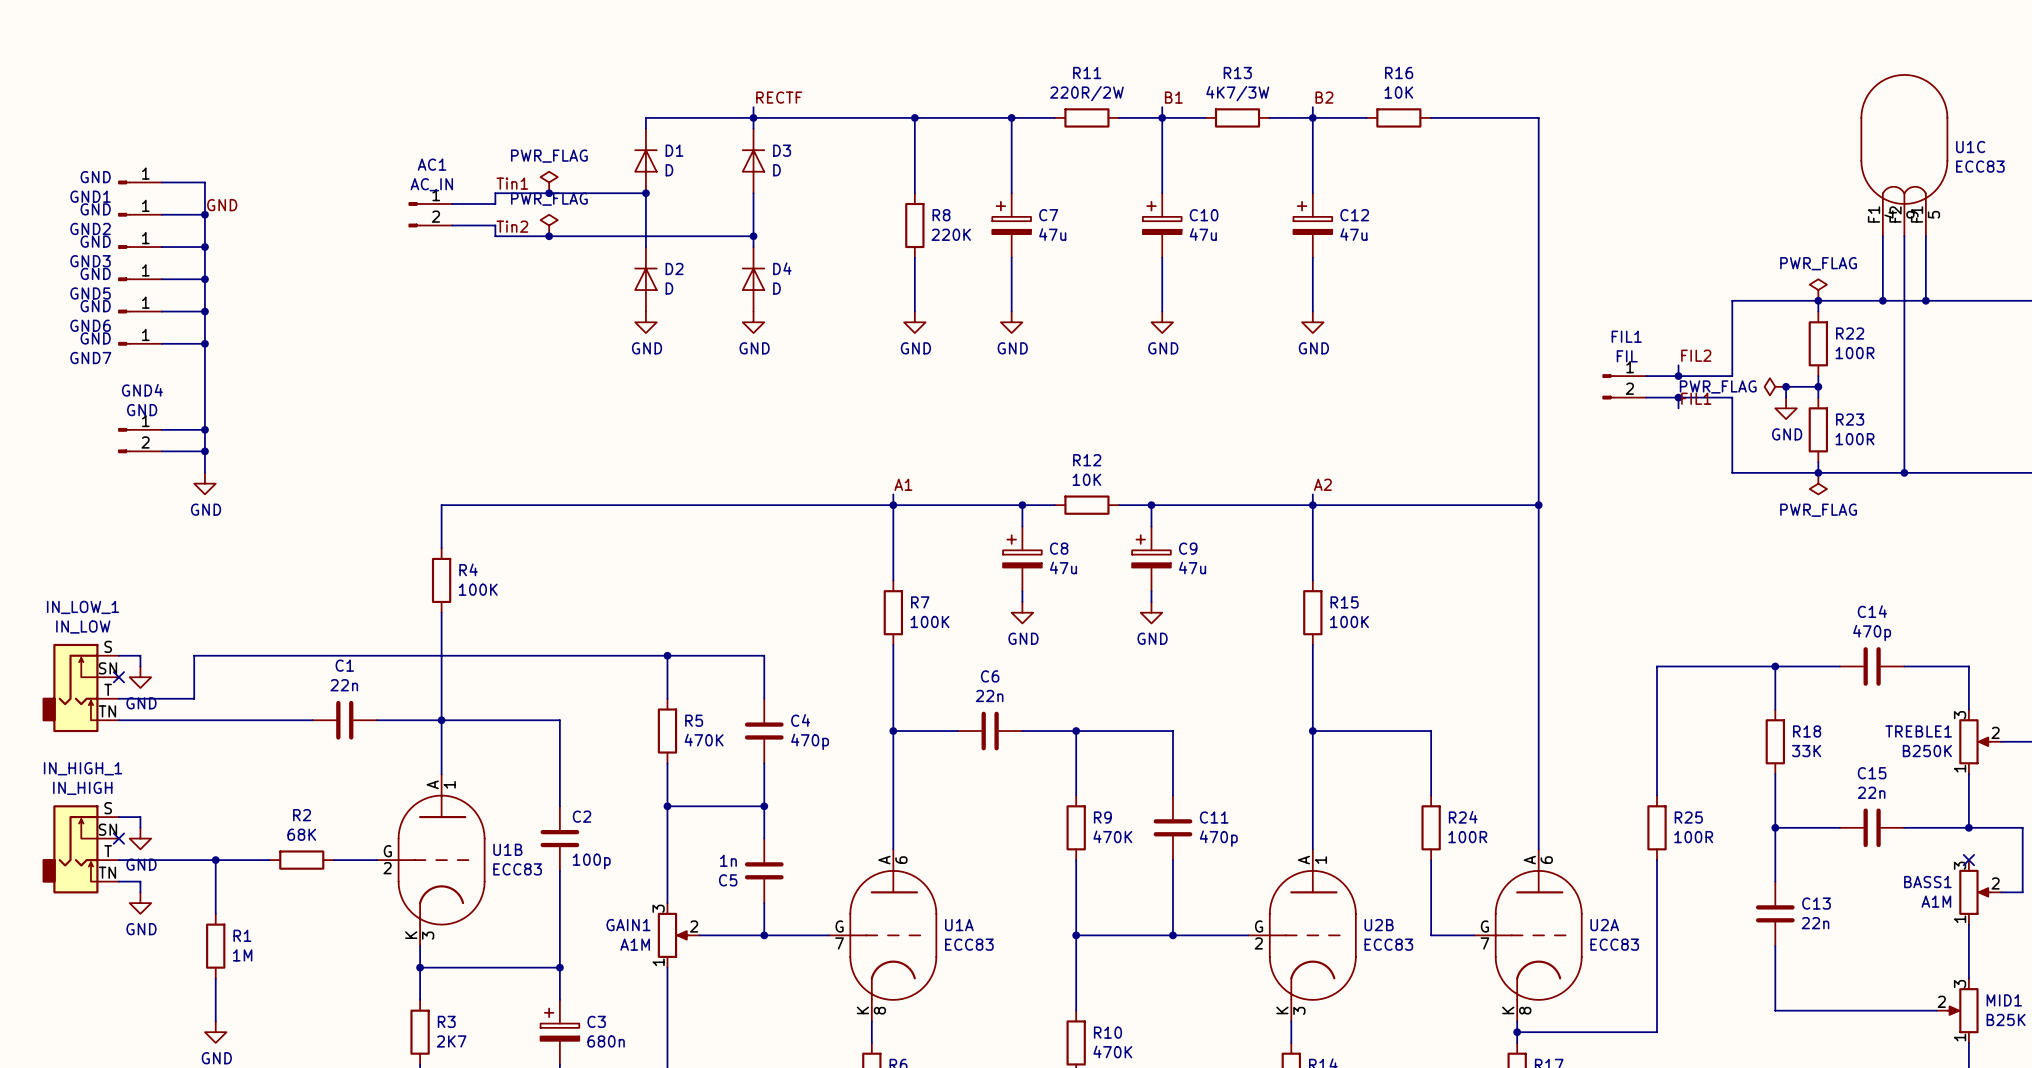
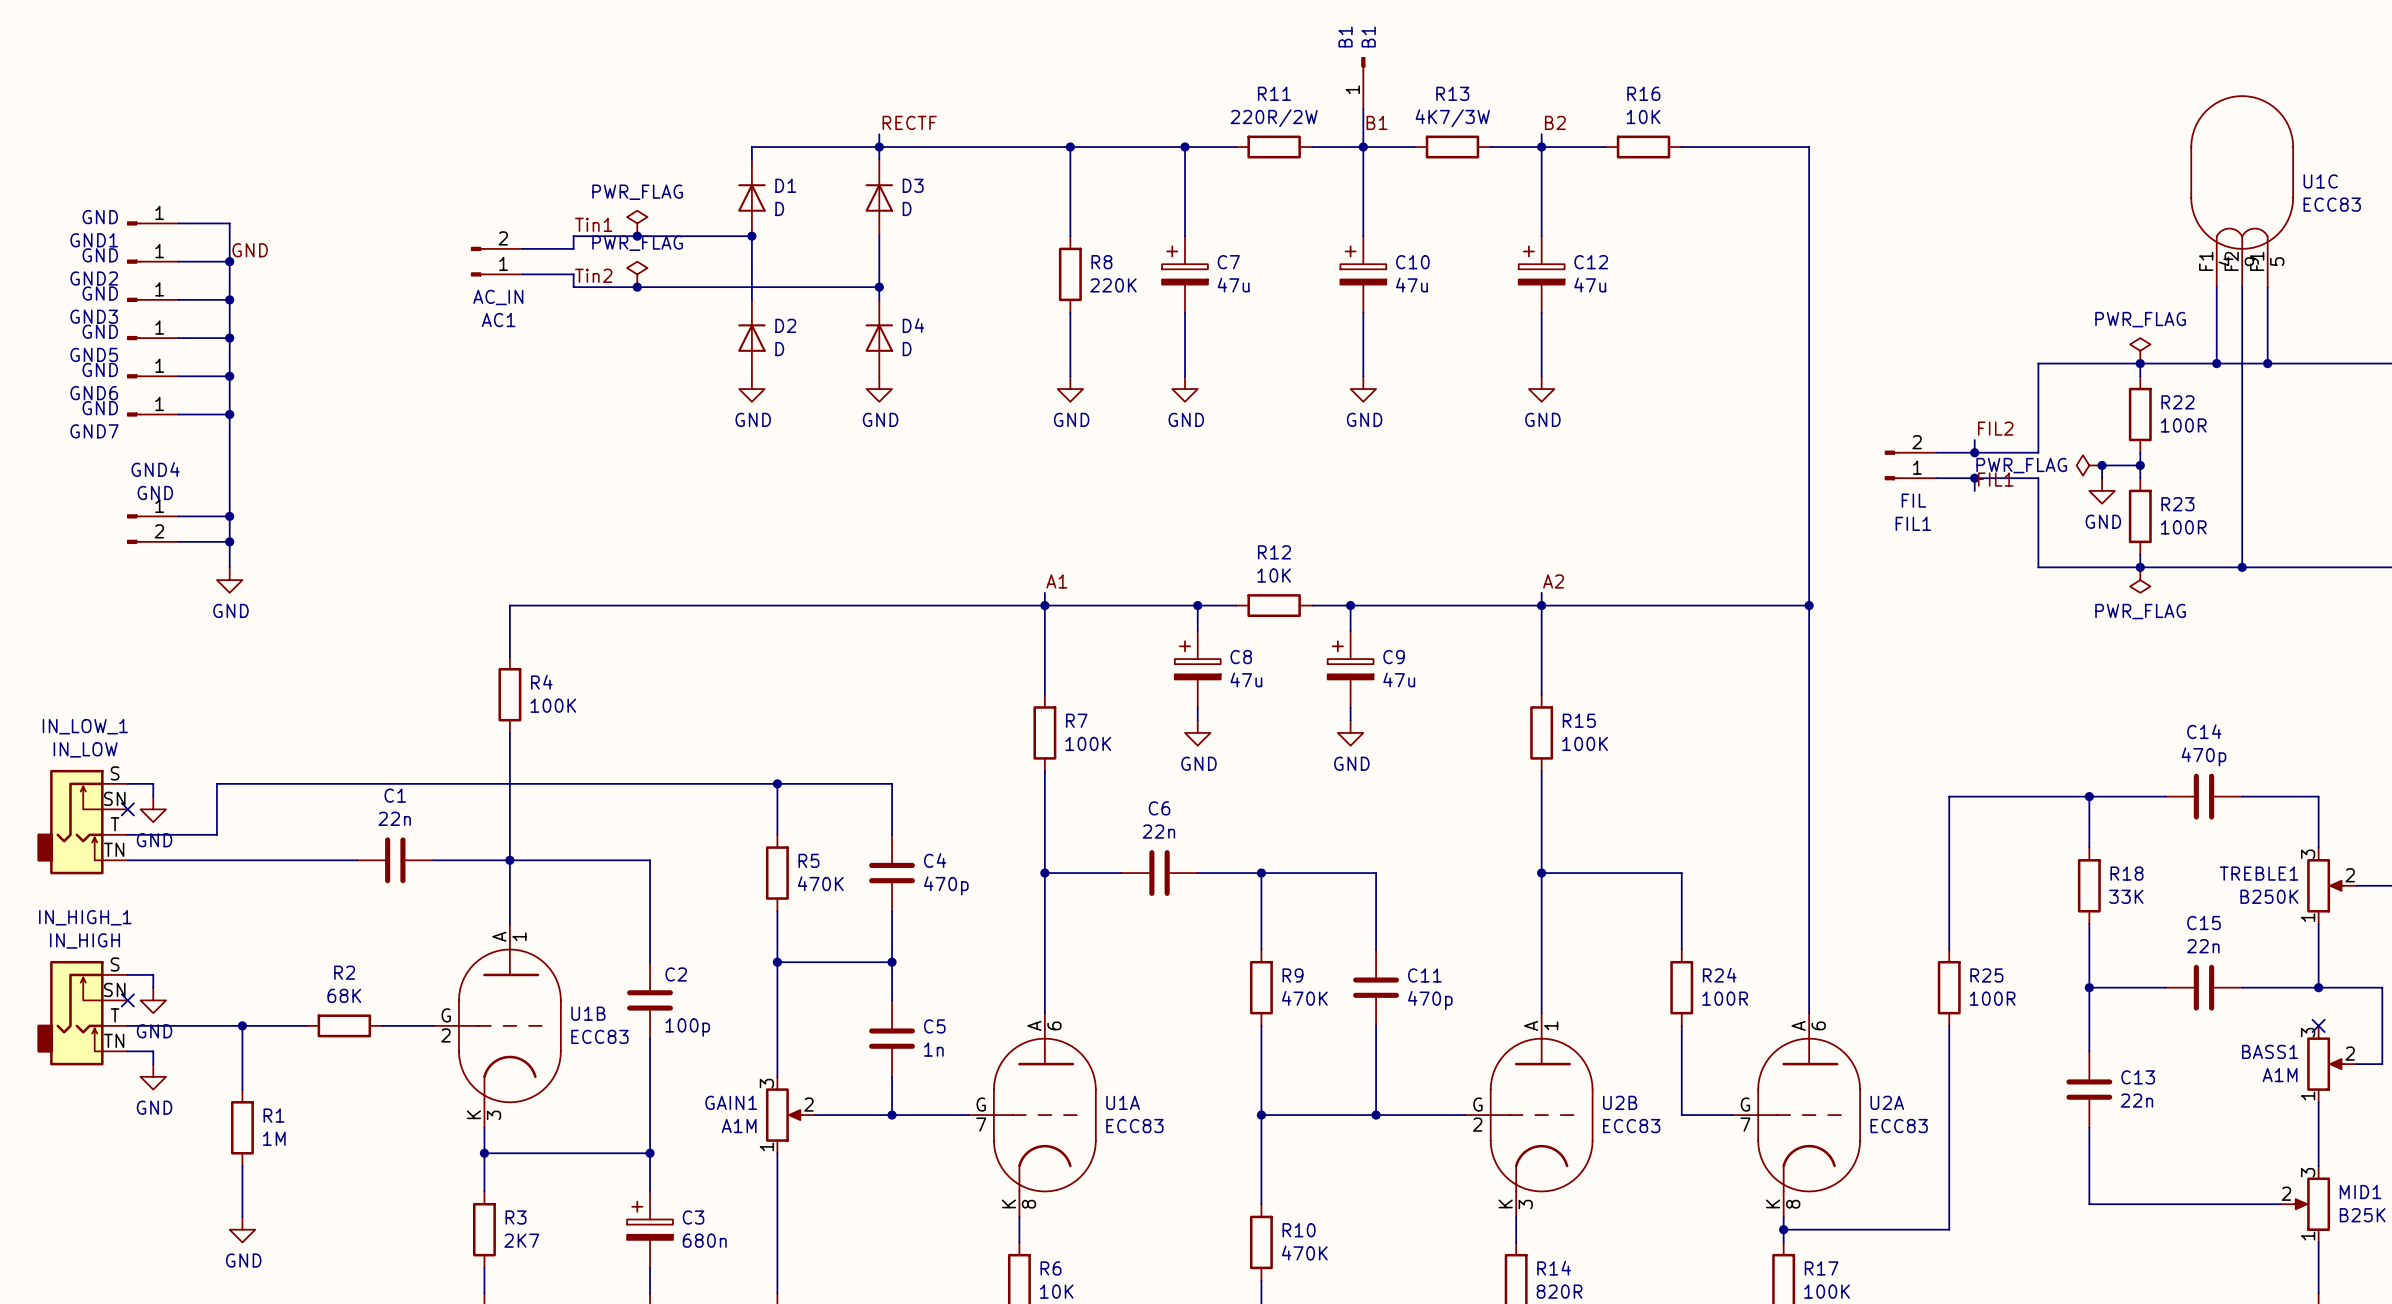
B1: none -> B1 (1363, 82)
wire: none -> (1363, 108) (1363, 134)
AC1 flip: as is (414, 214) -> up-down (478, 261)
FIL1 flip: as is (1608, 386) -> up-down (1891, 465)
C5 value position: 1n (728, 860) -> 1n (933, 1049)
C5 name position: C5 (728, 880) -> C5 (934, 1026)

